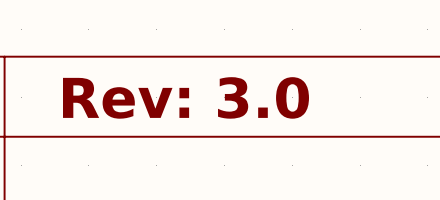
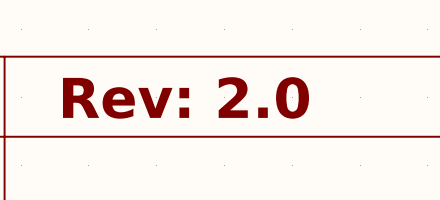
title block: Rev: 3.0 (186, 97) -> Rev: 2.0 (186, 97)

